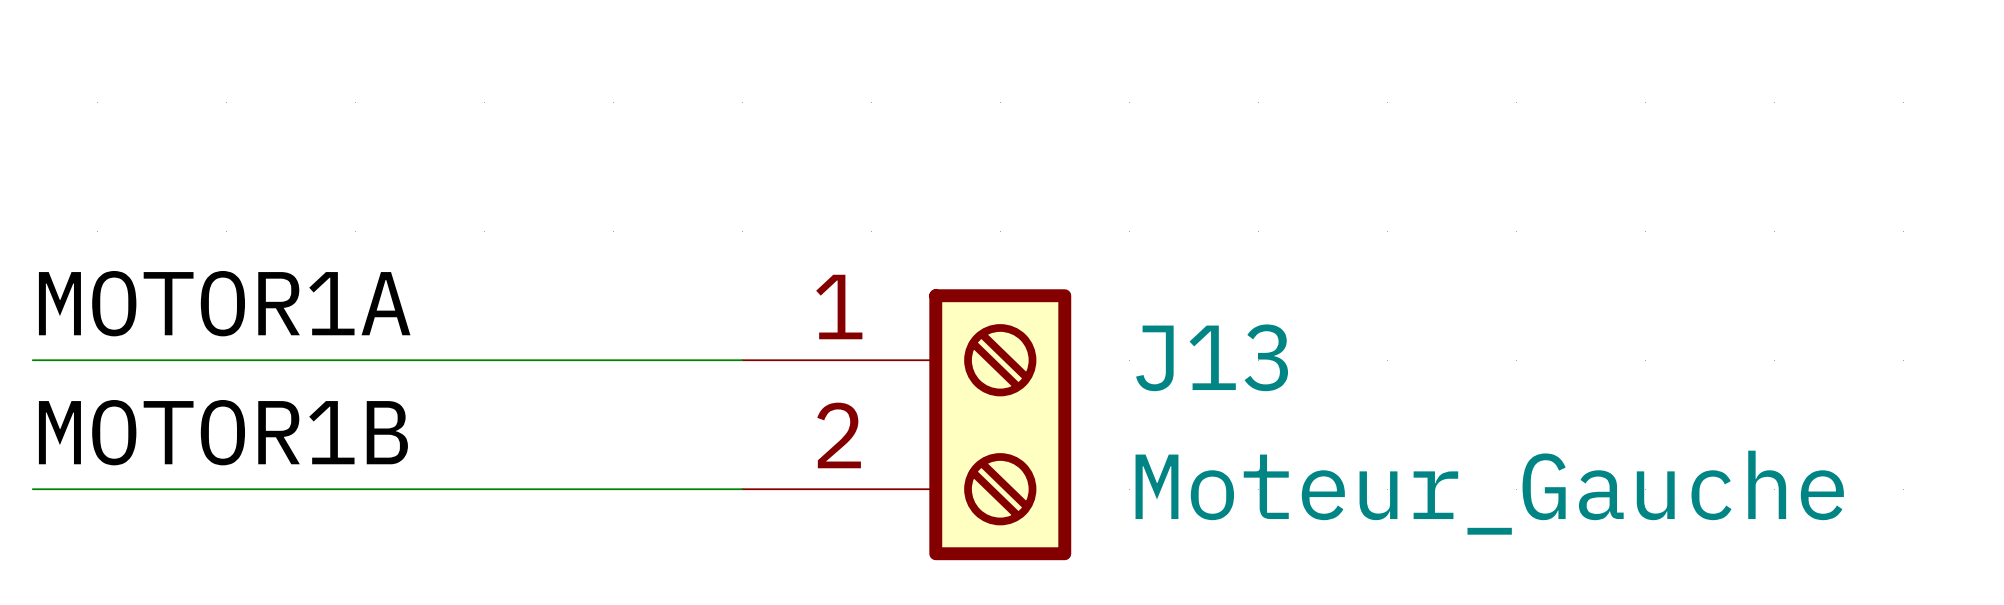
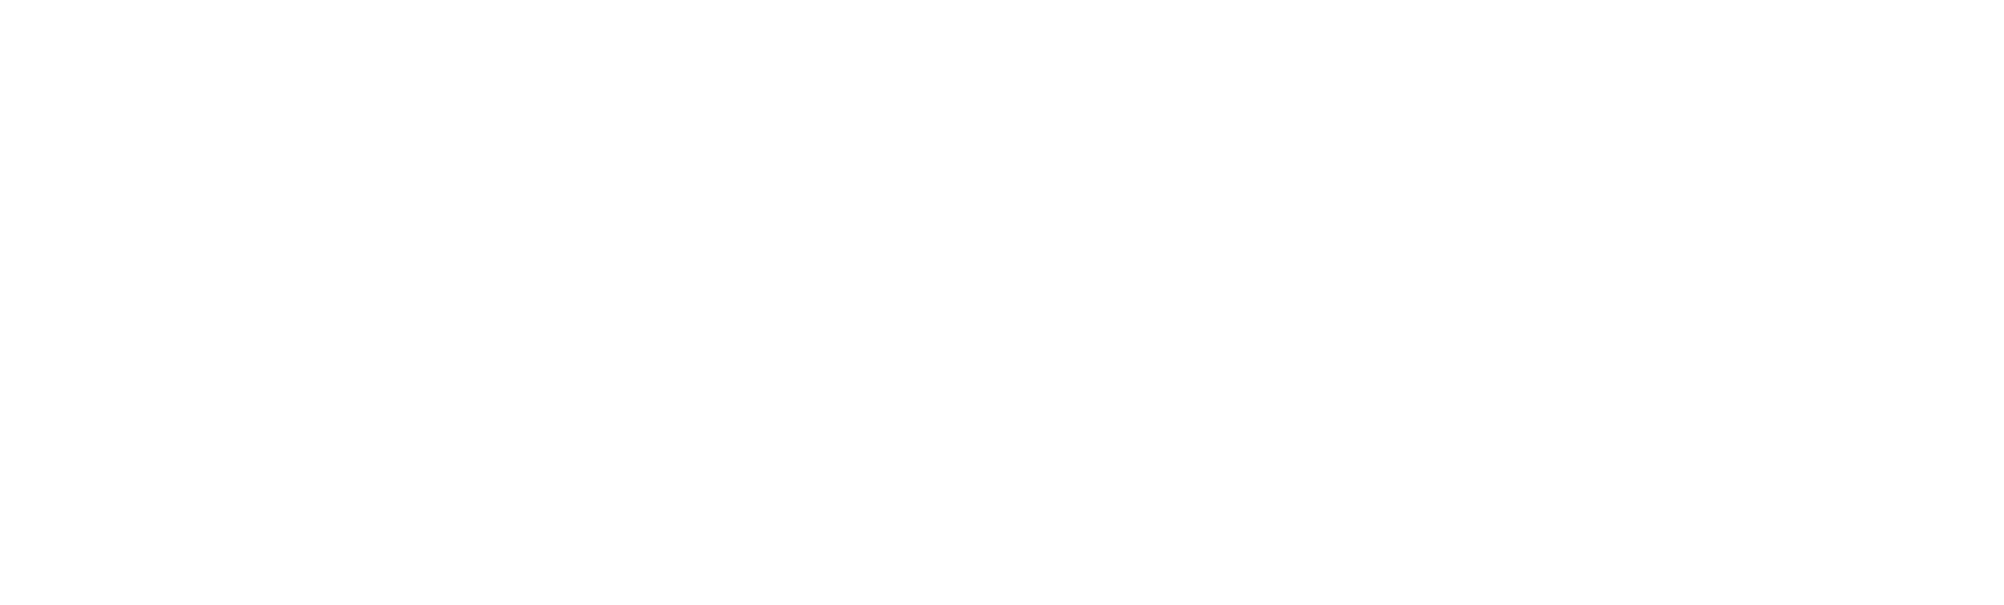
label: MOTOR1A (224, 303) -> none
wire: (32, 360) (742, 360) -> none
J13: Moteur_Gauche (906, 424) -> none
label: MOTOR1B (223, 432) -> none
wire: (32, 489) (742, 489) -> none

